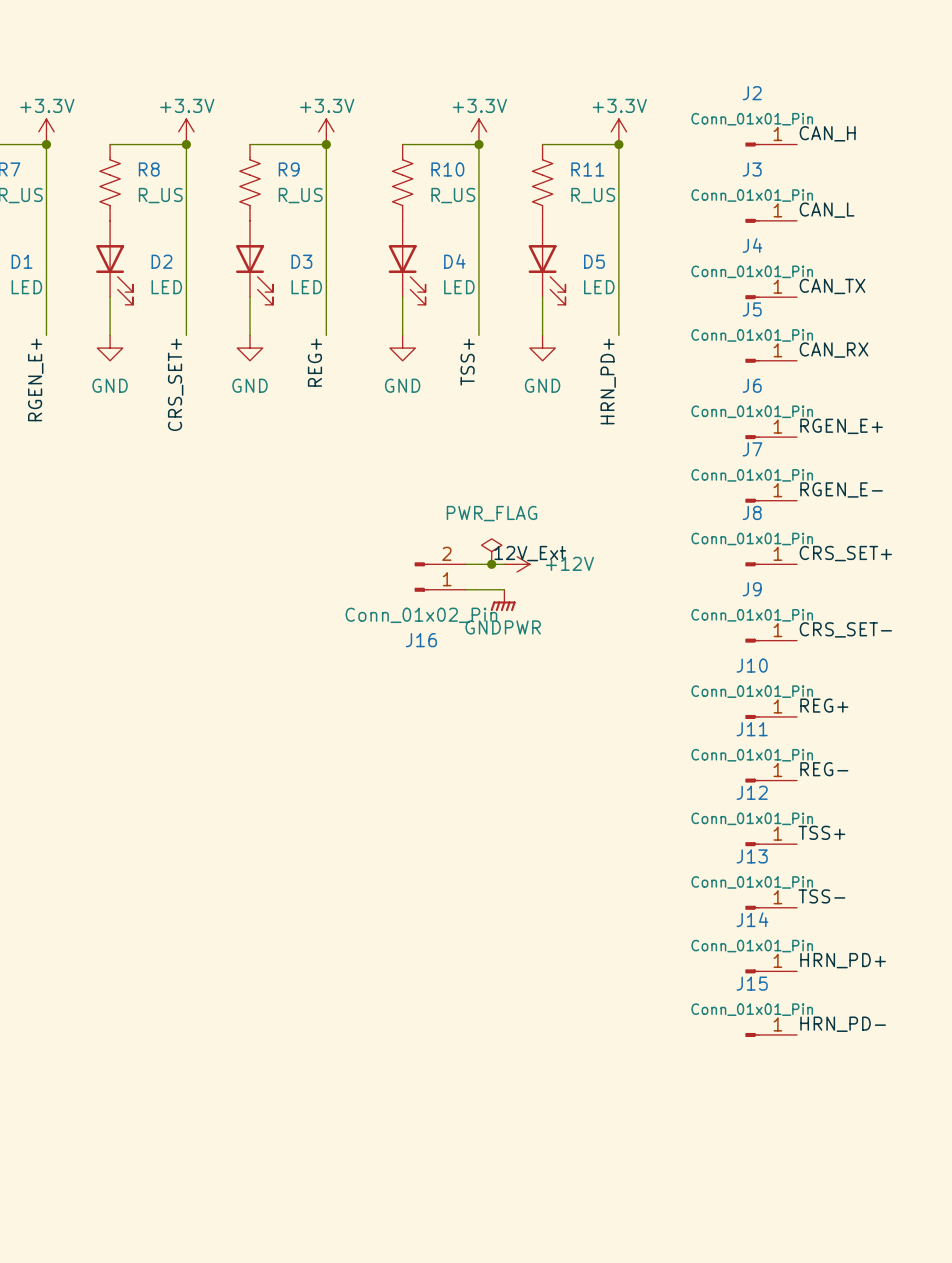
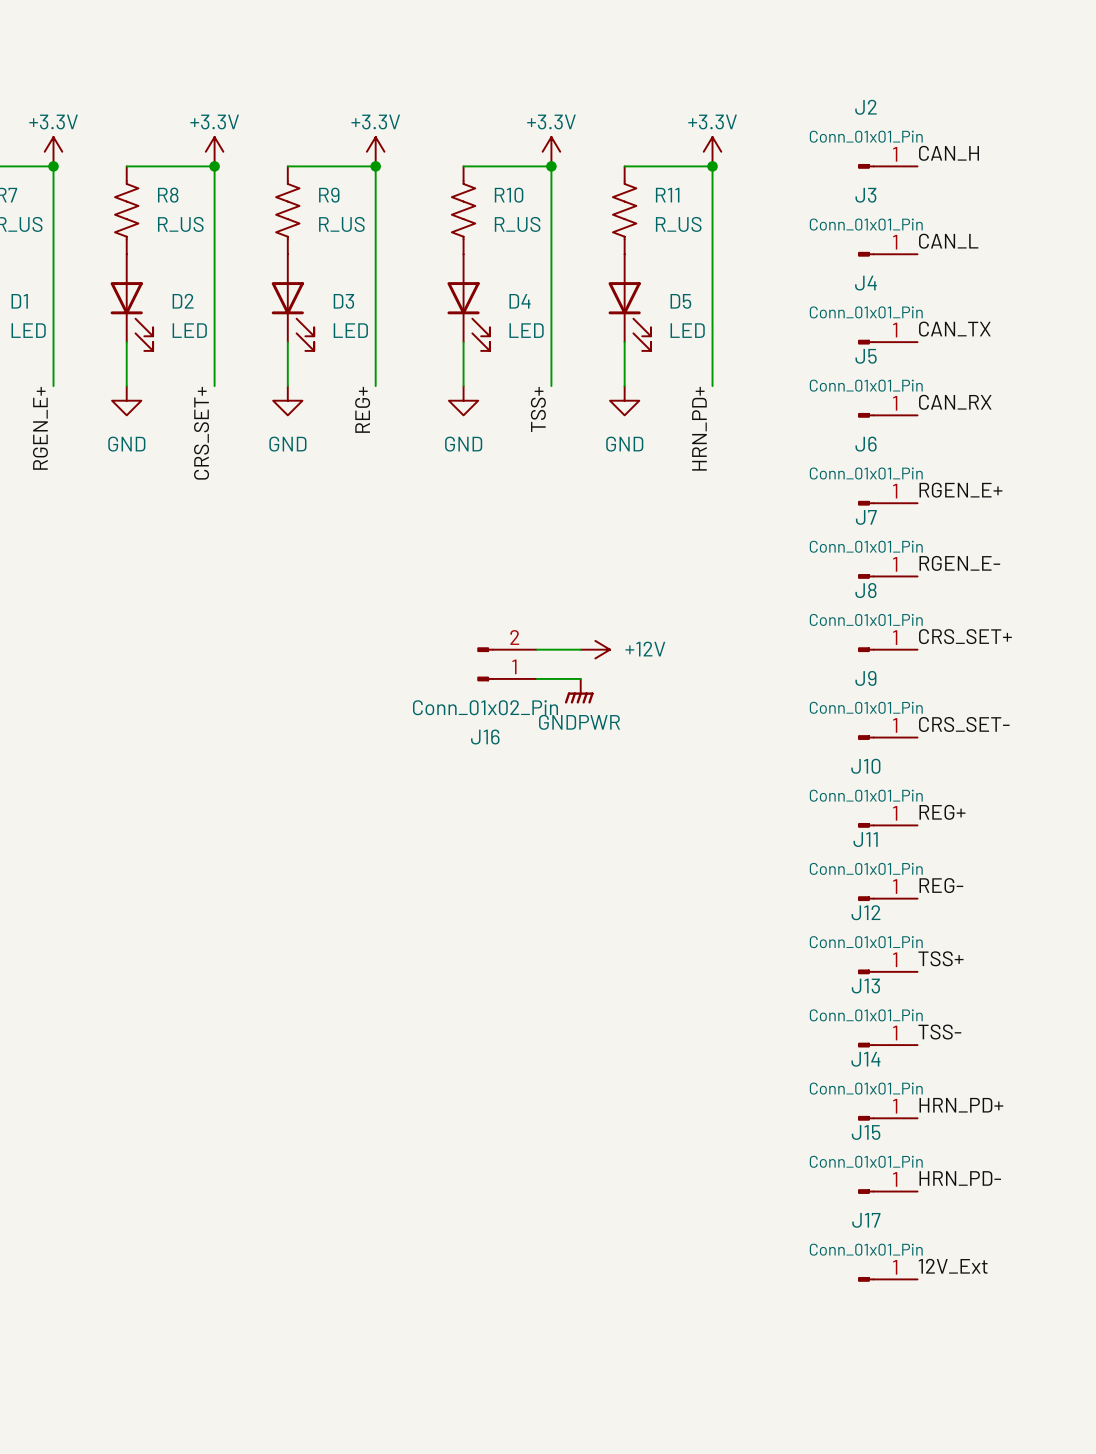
power symbol: PWR_FLAG (491, 551) -> none
label: 12V_Ext (530, 553) -> none
junction: (491, 564) -> none
label: none -> 12V_Ext (953, 1266)
J17: none -> Conn_01x01_Pin (887, 1279)

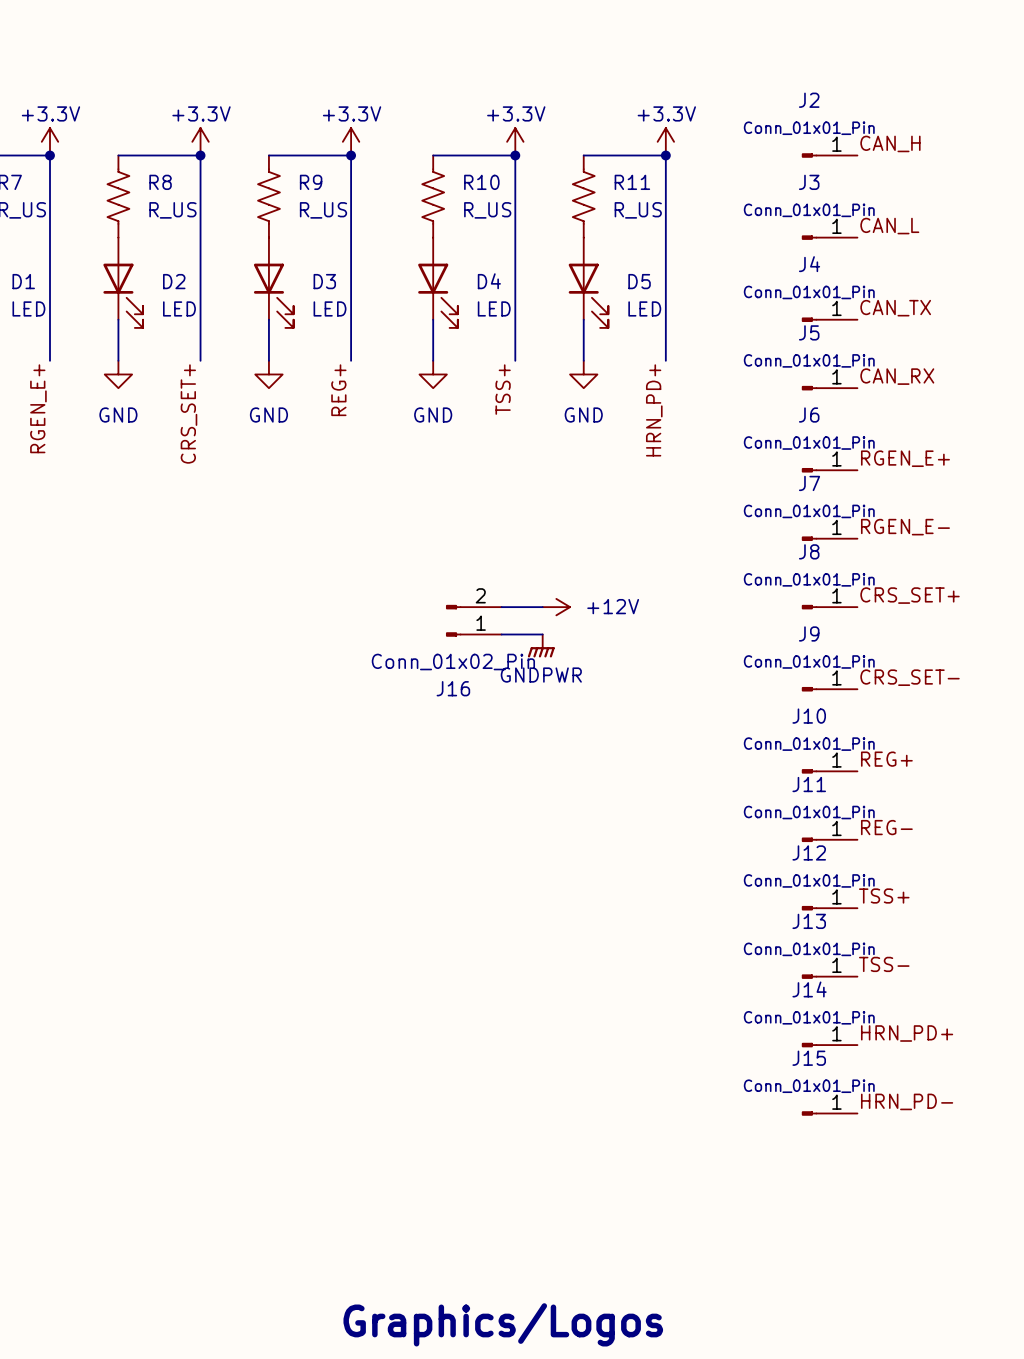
label: 12V_Ext (953, 1266) -> none
J17: Conn_01x01_Pin (887, 1279) -> none
text: none -> Graphics/Logos (503, 1324)

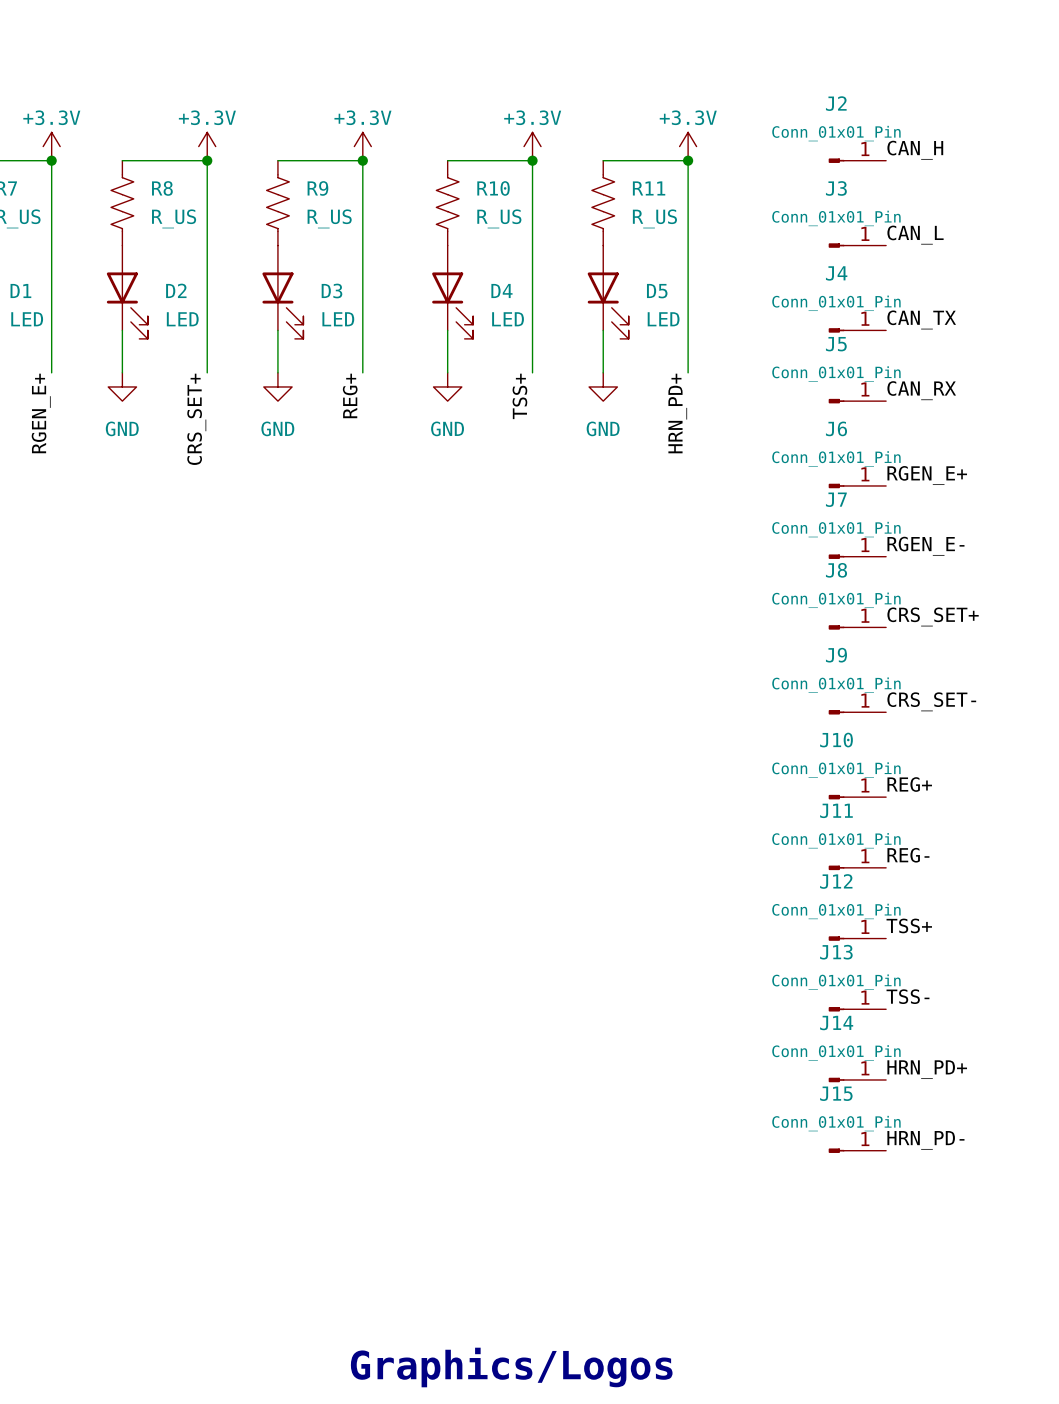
wire: (501, 607) (542, 607) -> none
power symbol: +12V (556, 607) -> none
J16: Conn_01x02_Pin (473, 620) -> none
wire: (501, 634) (542, 634) -> none
power symbol: GNDPWR (541, 645) -> none

